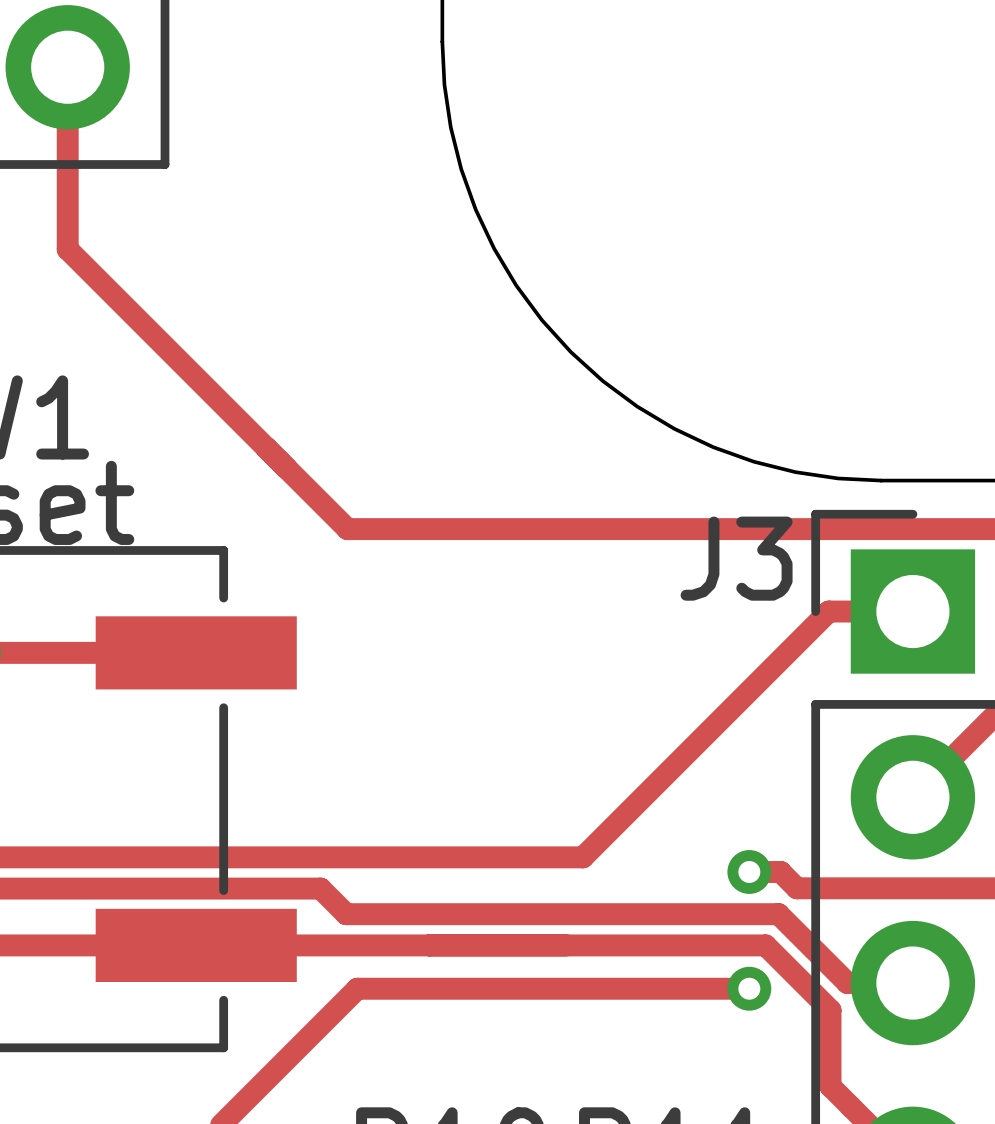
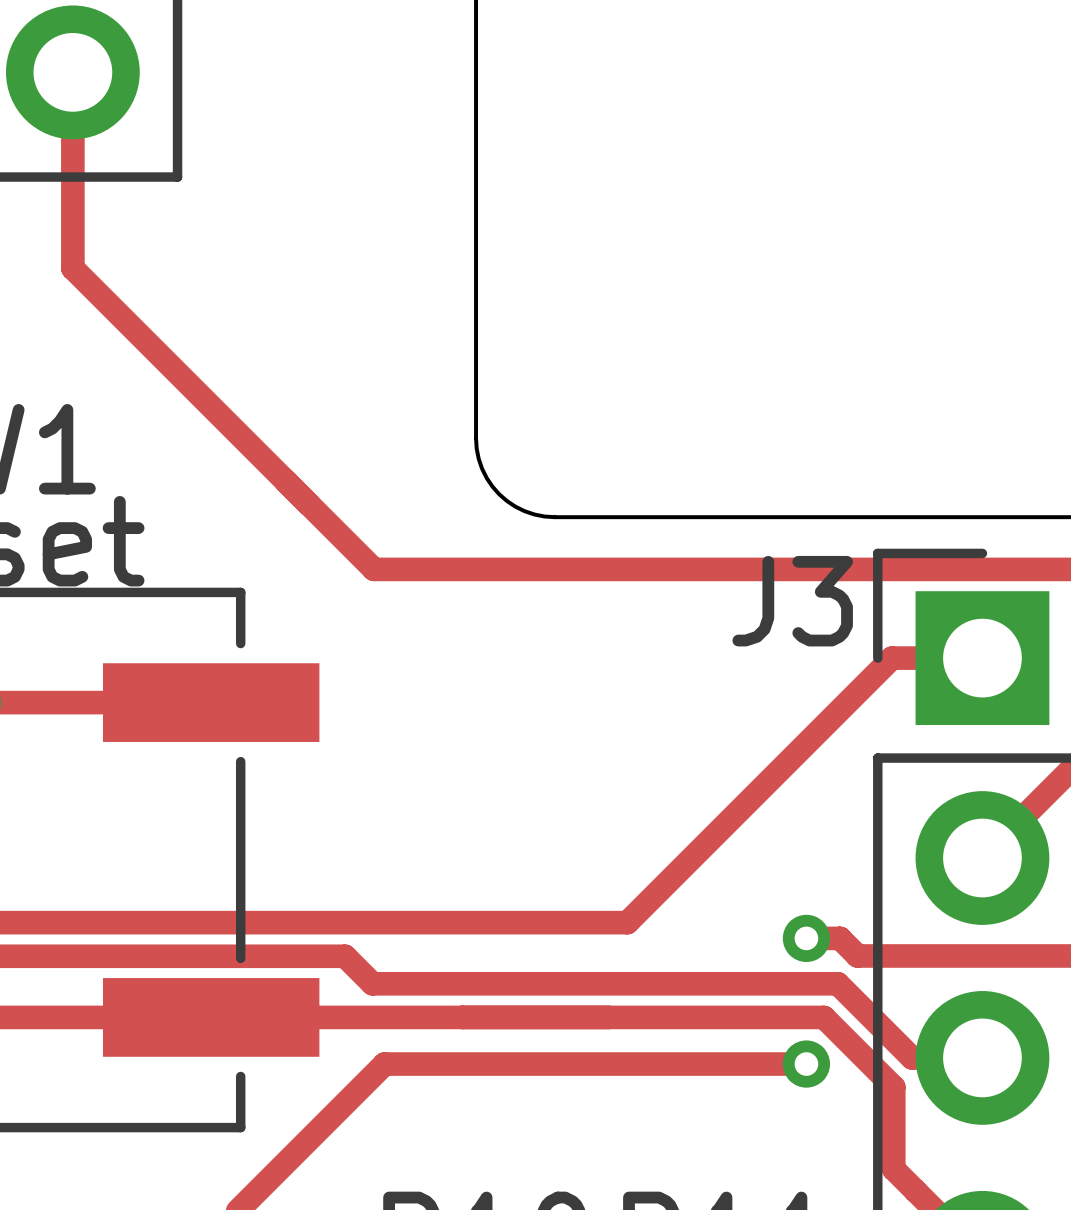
board edge: (442, 41) (444, 84) (450, 127) (461, 169) (475, 209) (494, 248) (516, 285) (541, 320) (570, 352) (602, 380) (637, 406) (674, 428) (713, 447) (753, 461) (795, 472) (838, 478) (881, 480) -> (476, 44) (476, 438) (482, 468) (499, 494) (524, 511) (554, 517) (948, 517)

